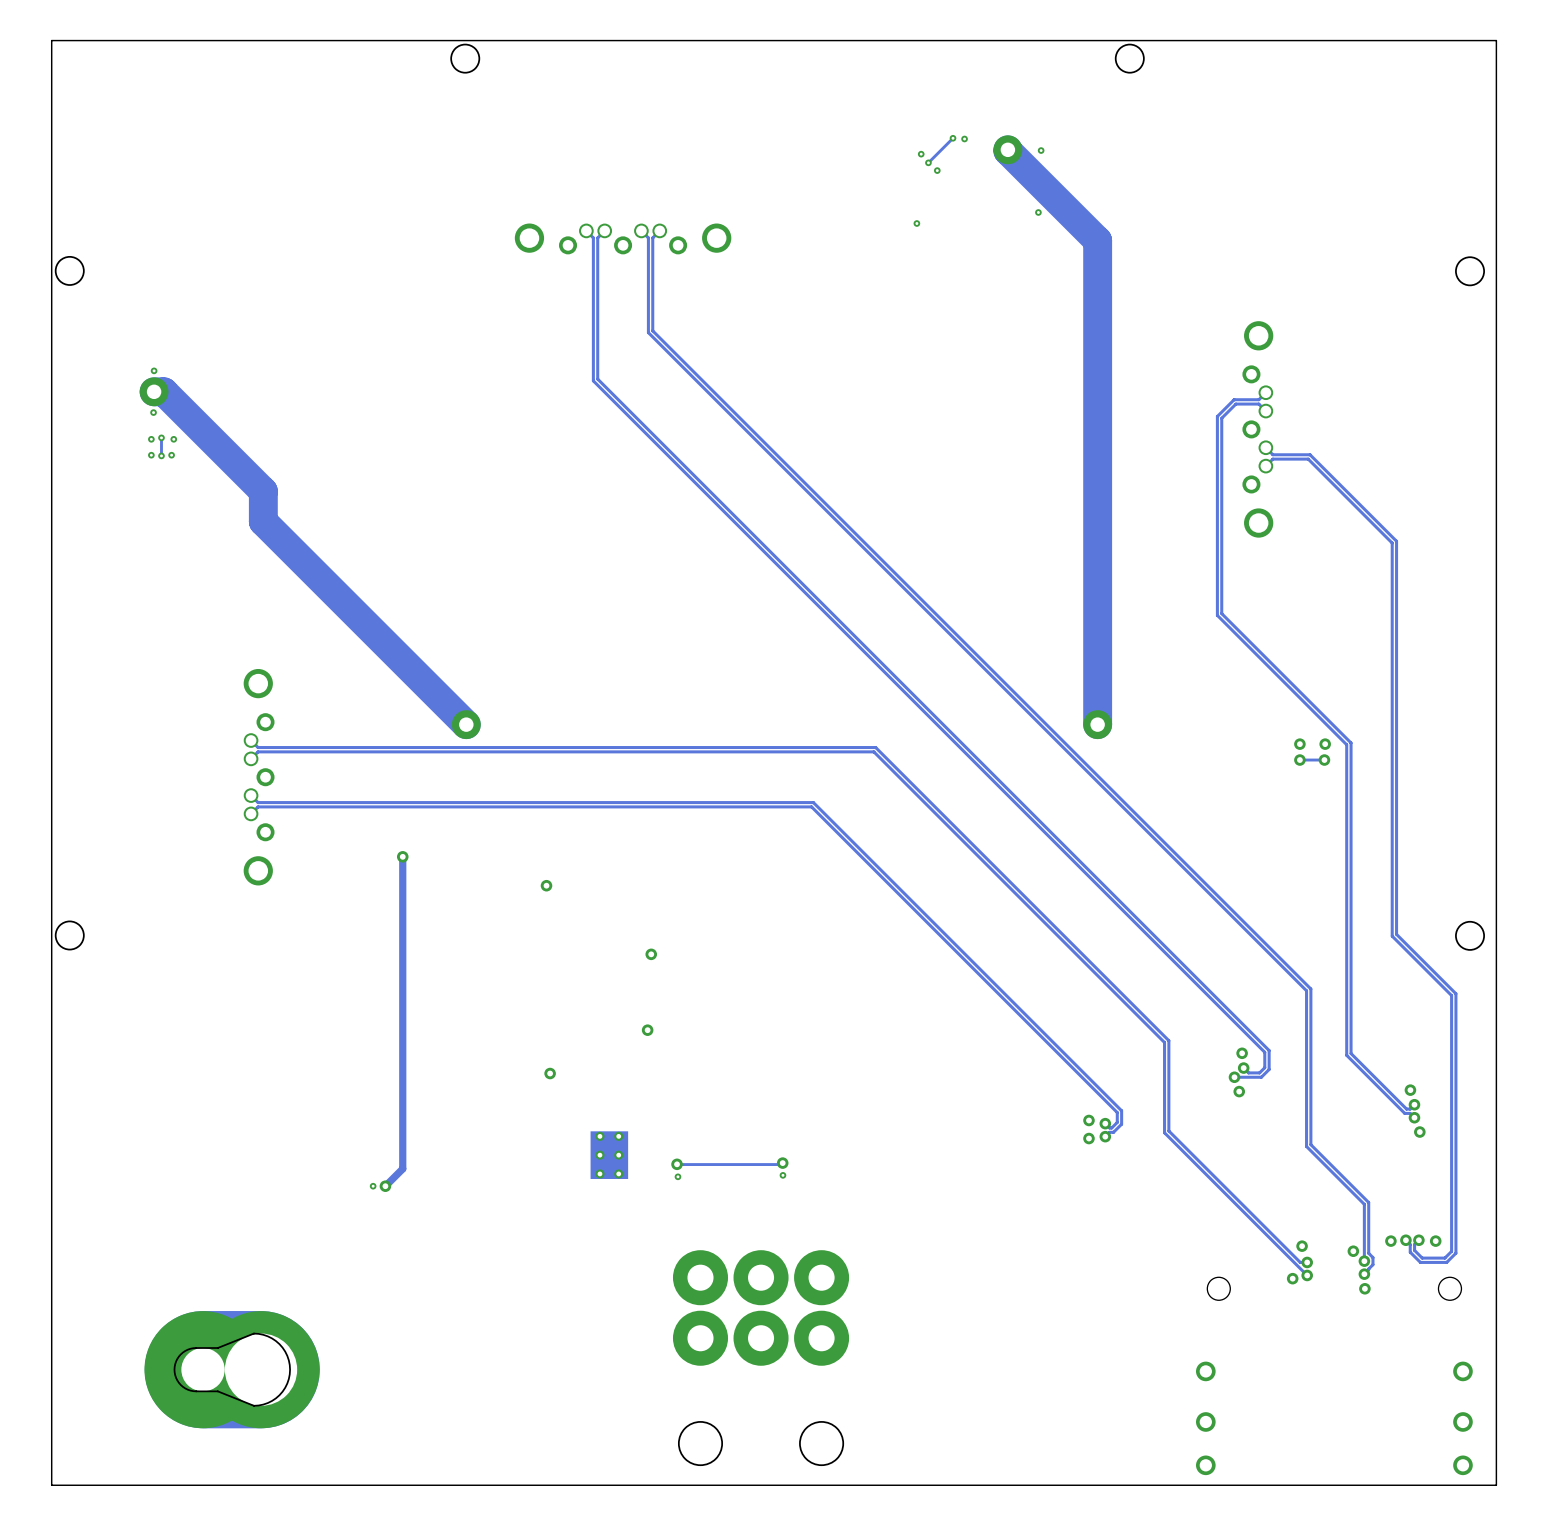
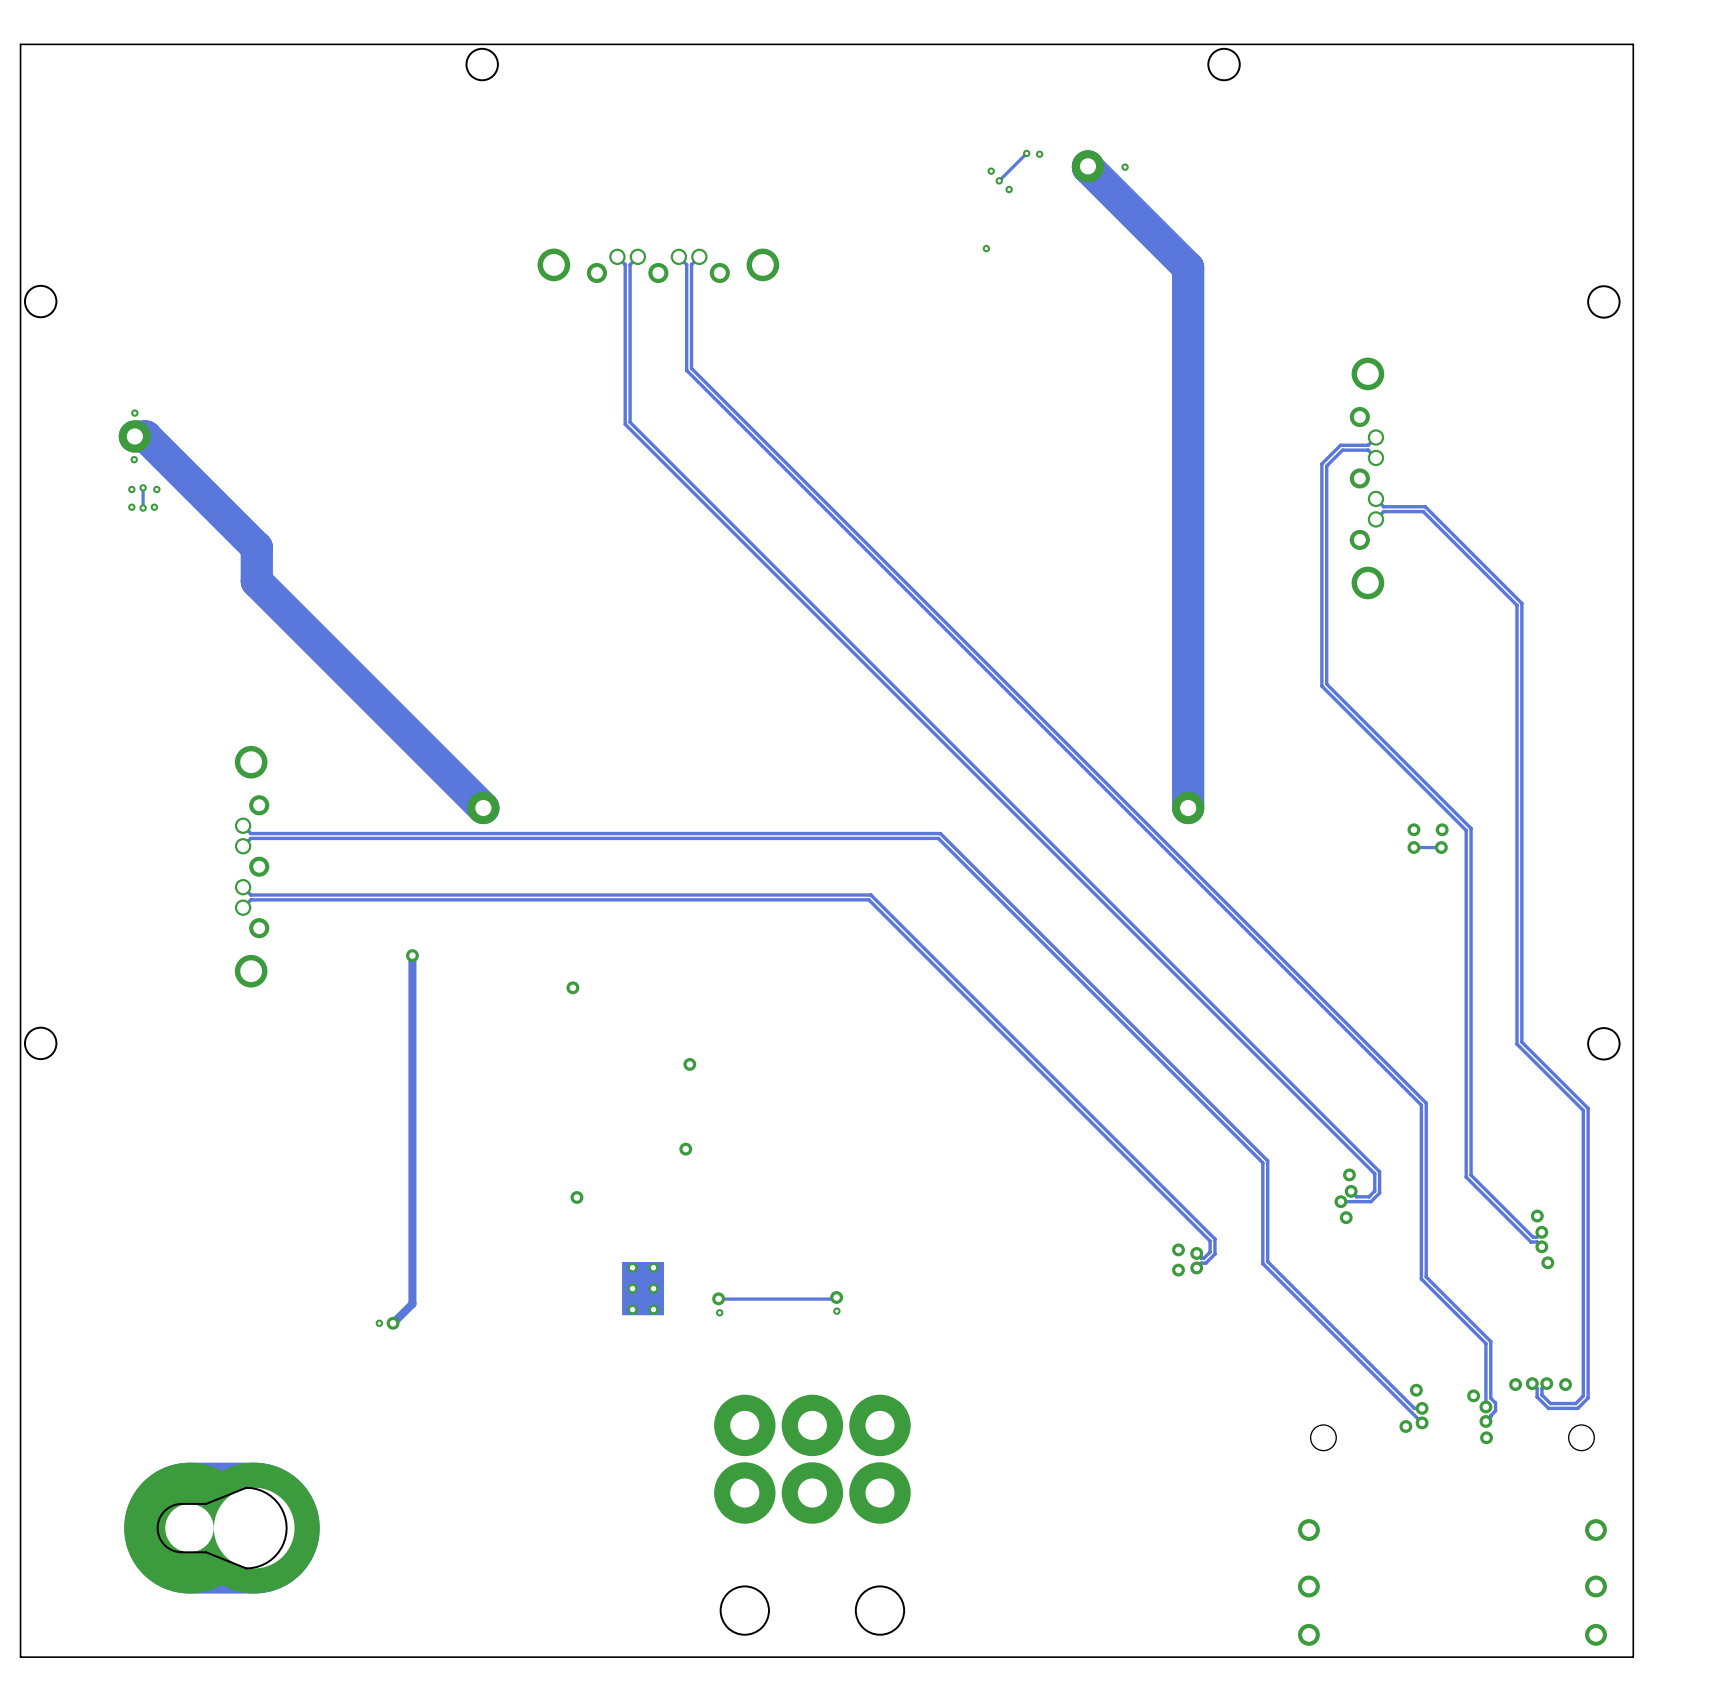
via: (1038, 212) -> none

